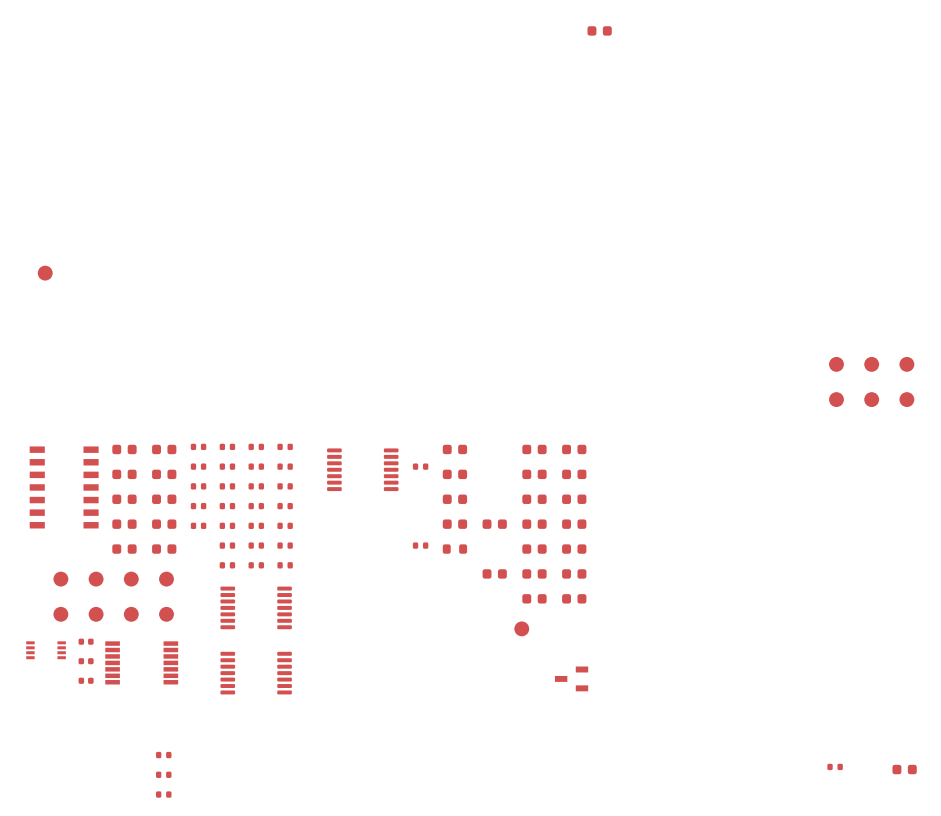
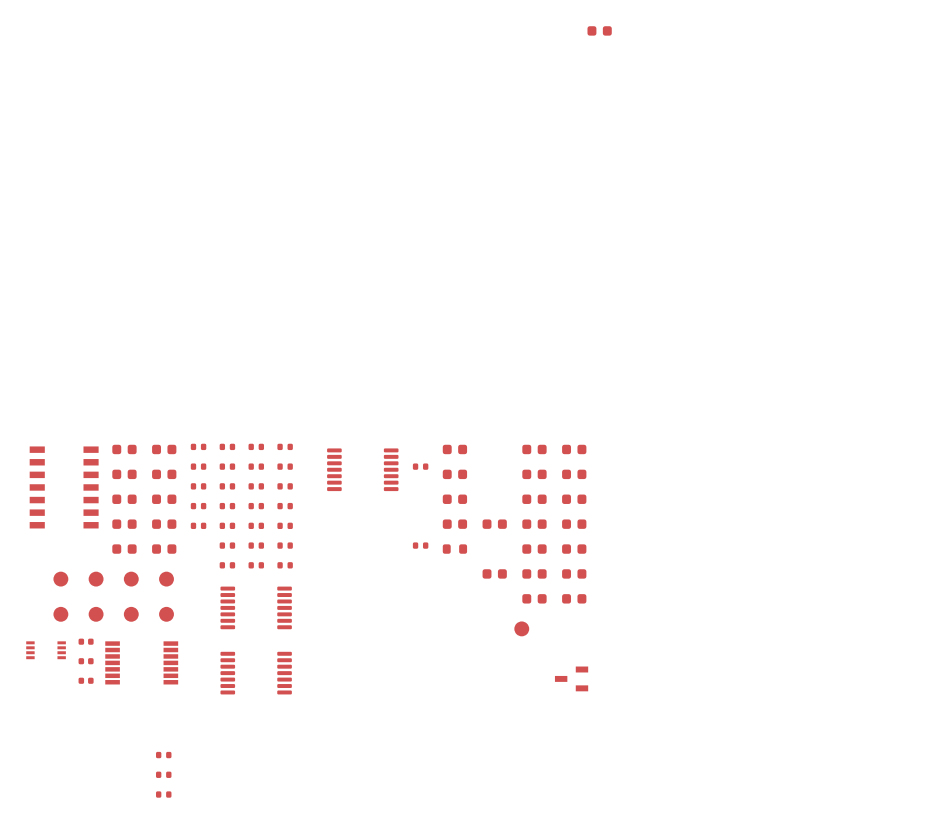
part: (45, 273) -> none
part: (836, 364) -> none
part: (871, 364) -> none
part: (906, 364) -> none
part: (836, 399) -> none
part: (871, 399) -> none
part: (906, 399) -> none
part: (835, 766) -> none
part: (904, 769) -> none

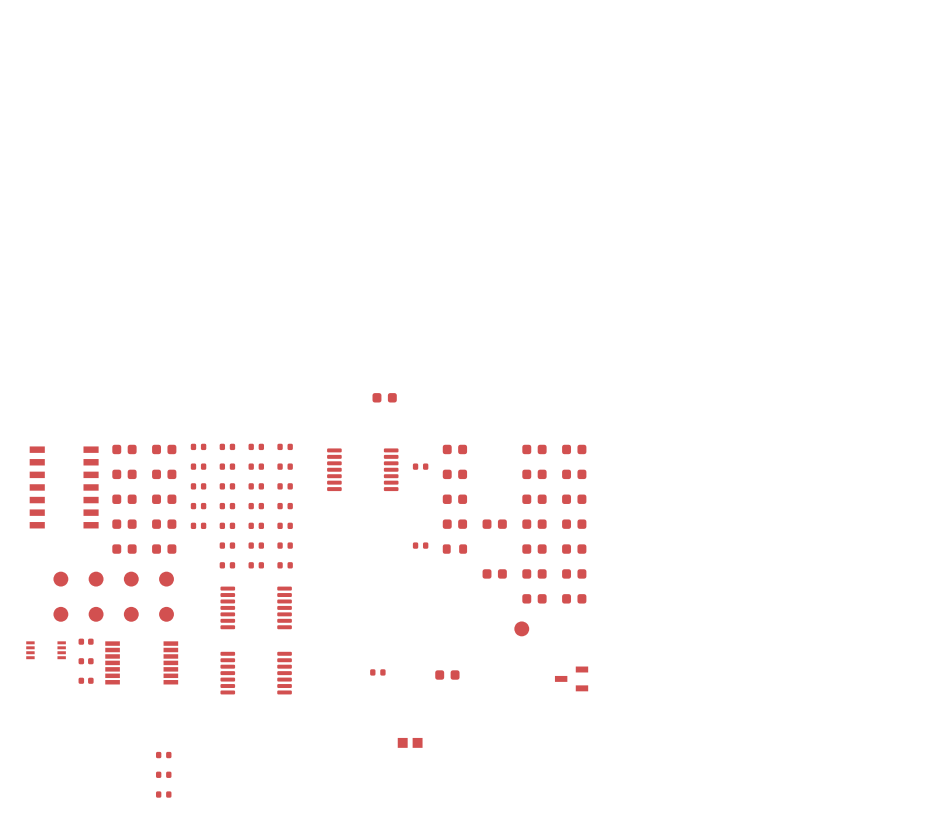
part: (599, 30) -> none
part: none -> (384, 397)
part: none -> (377, 672)
part: none -> (447, 675)
part: none -> (410, 742)

